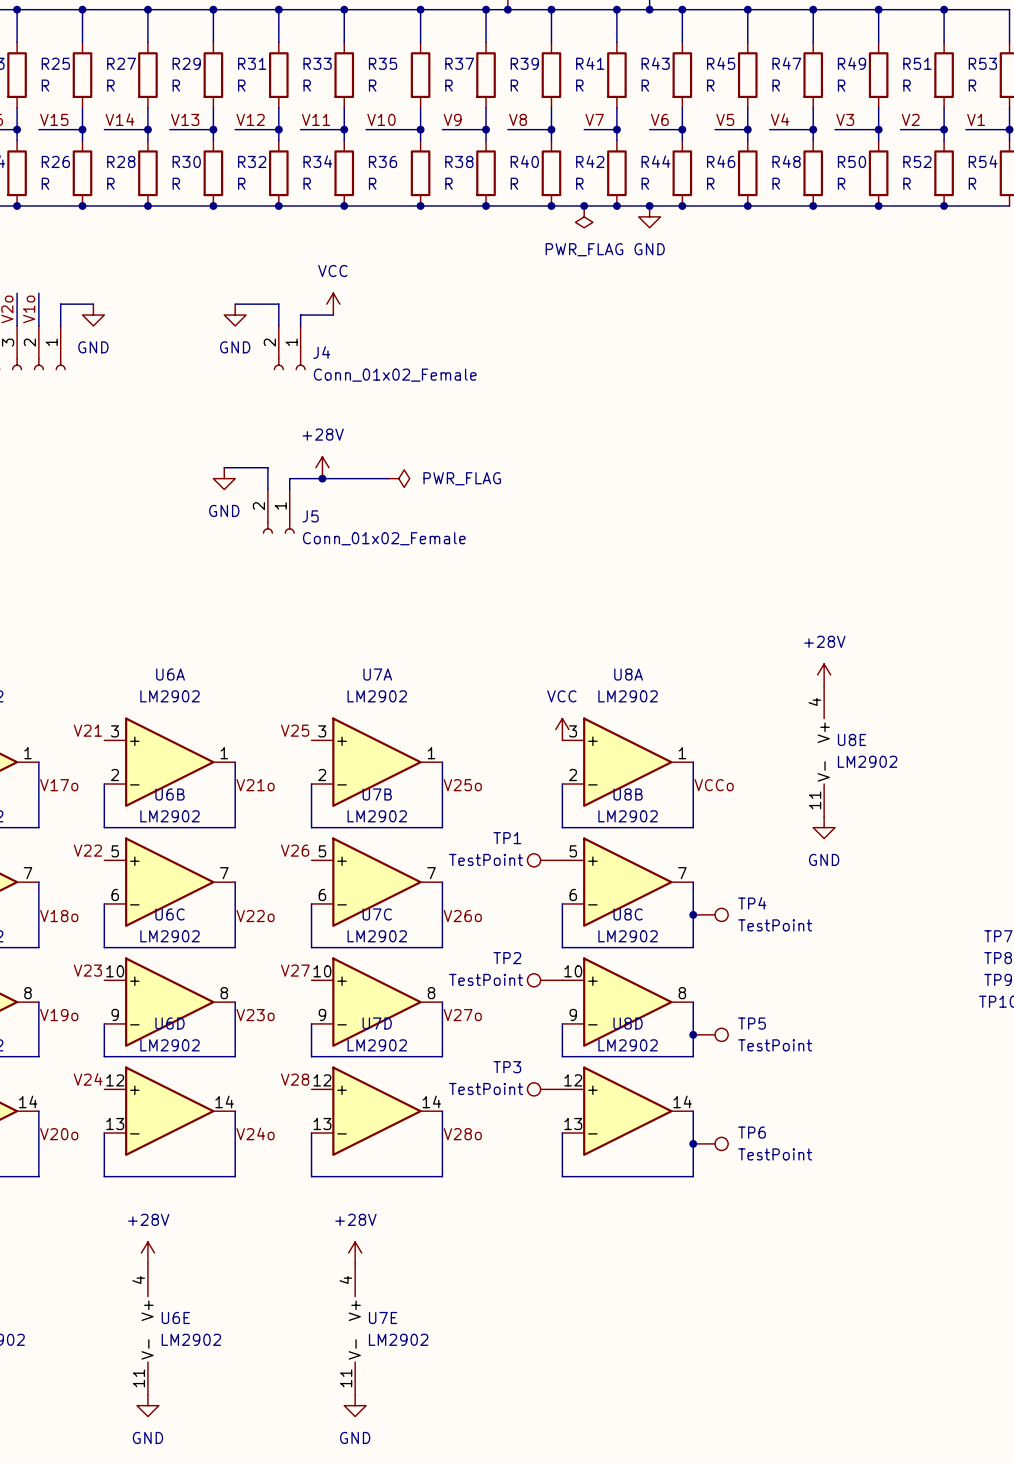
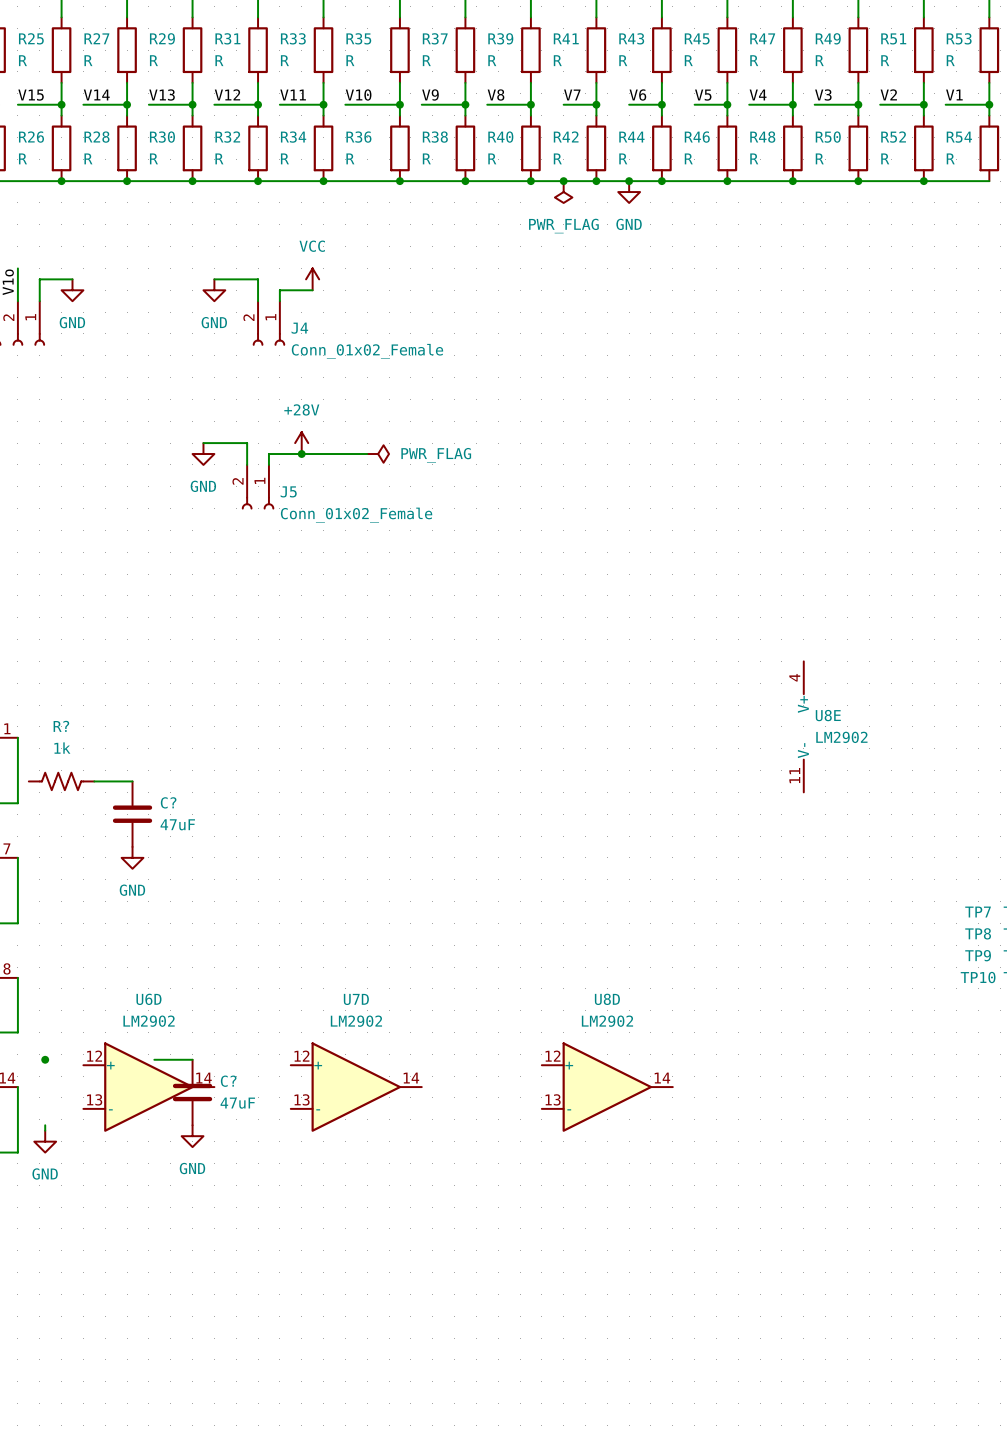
power symbol: +28V (824, 674) -> none
power symbol: VCC (562, 729) -> none
label: V21 (87, 730) -> none
label: V25 (295, 730) -> none
U6A: LM2902 (169, 762) -> none
wire: (235, 762) (235, 827) (104, 827) (104, 784) -> none
U7A: LM2902 (376, 762) -> none
wire: (442, 762) (442, 827) (311, 827) (311, 784) -> none
U8A: LM2902 (627, 762) -> none
wire: (693, 762) (693, 827) (562, 827) (562, 784) -> none
label: V17o (59, 785) -> none
label: V21o (255, 785) -> none
label: V25o (462, 785) -> none
label: VCCo (714, 785) -> none
R?: none -> 1k (61, 781)
wire: none -> (94, 781) (132, 781)
power symbol: GND (824, 827) -> none
C?: none -> 47uF (132, 814)
label: V22 (87, 850) -> none
label: V26 (295, 850) -> none
TP1: TestPoint (544, 860) -> none
power symbol: none -> GND (132, 857)
U6B: LM2902 (169, 882) -> none
wire: (235, 882) (235, 947) (104, 947) (104, 903) -> none
U7B: LM2902 (376, 882) -> none
wire: (442, 882) (442, 947) (311, 947) (311, 903) -> none
U8B: LM2902 (627, 882) -> none
wire: (693, 882) (693, 947) (562, 947) (562, 903) -> none
junction: (693, 914) -> none
TP4: TestPoint (710, 914) -> none
label: V18o (59, 916) -> none
label: V22o (255, 916) -> none
label: V26o (462, 916) -> none
label: V23 (87, 970) -> none
label: V27 (295, 970) -> none
TP2: TestPoint (544, 980) -> none
U6C: LM2902 (169, 1002) -> none
wire: (235, 1002) (235, 1056) (104, 1056) (104, 1023) -> none
U7C: LM2902 (376, 1002) -> none
wire: (442, 1002) (442, 1056) (311, 1056) (311, 1023) -> none
U8C: LM2902 (627, 1002) -> none
wire: (693, 1002) (693, 1056) (562, 1056) (562, 1023) -> none
label: V19o (59, 1015) -> none
label: V23o (255, 1015) -> none
label: V27o (462, 1015) -> none
junction: (693, 1034) -> none
TP5: TestPoint (710, 1034) -> none
label: V24 (88, 1079) -> none
label: V28 (295, 1079) -> none
junction: none -> (45, 1059)
wire: none -> (154, 1059) (192, 1059)
TP3: TestPoint (544, 1089) -> none
wire: (235, 1111) (235, 1176) (104, 1176) (104, 1133) -> none
wire: (442, 1111) (442, 1176) (311, 1176) (311, 1133) -> none
wire: (693, 1111) (693, 1176) (562, 1176) (562, 1133) -> none
C?: none -> 47uF (192, 1092)
label: V24o (255, 1133) -> none
label: V20o (59, 1134) -> none
label: V28o (462, 1134) -> none
junction: (693, 1143) -> none
TP6: TestPoint (710, 1143) -> none
wire: none -> (45, 1125) (45, 1130)
power symbol: none -> GND (192, 1136)
power symbol: none -> GND (45, 1141)
power symbol: +28V (147, 1252) -> none
power symbol: +28V (355, 1252) -> none
U6E: LM2902 (147, 1329) -> none
U7E: LM2902 (355, 1329) -> none
power symbol: GND (147, 1405) -> none
power symbol: GND (355, 1405) -> none

